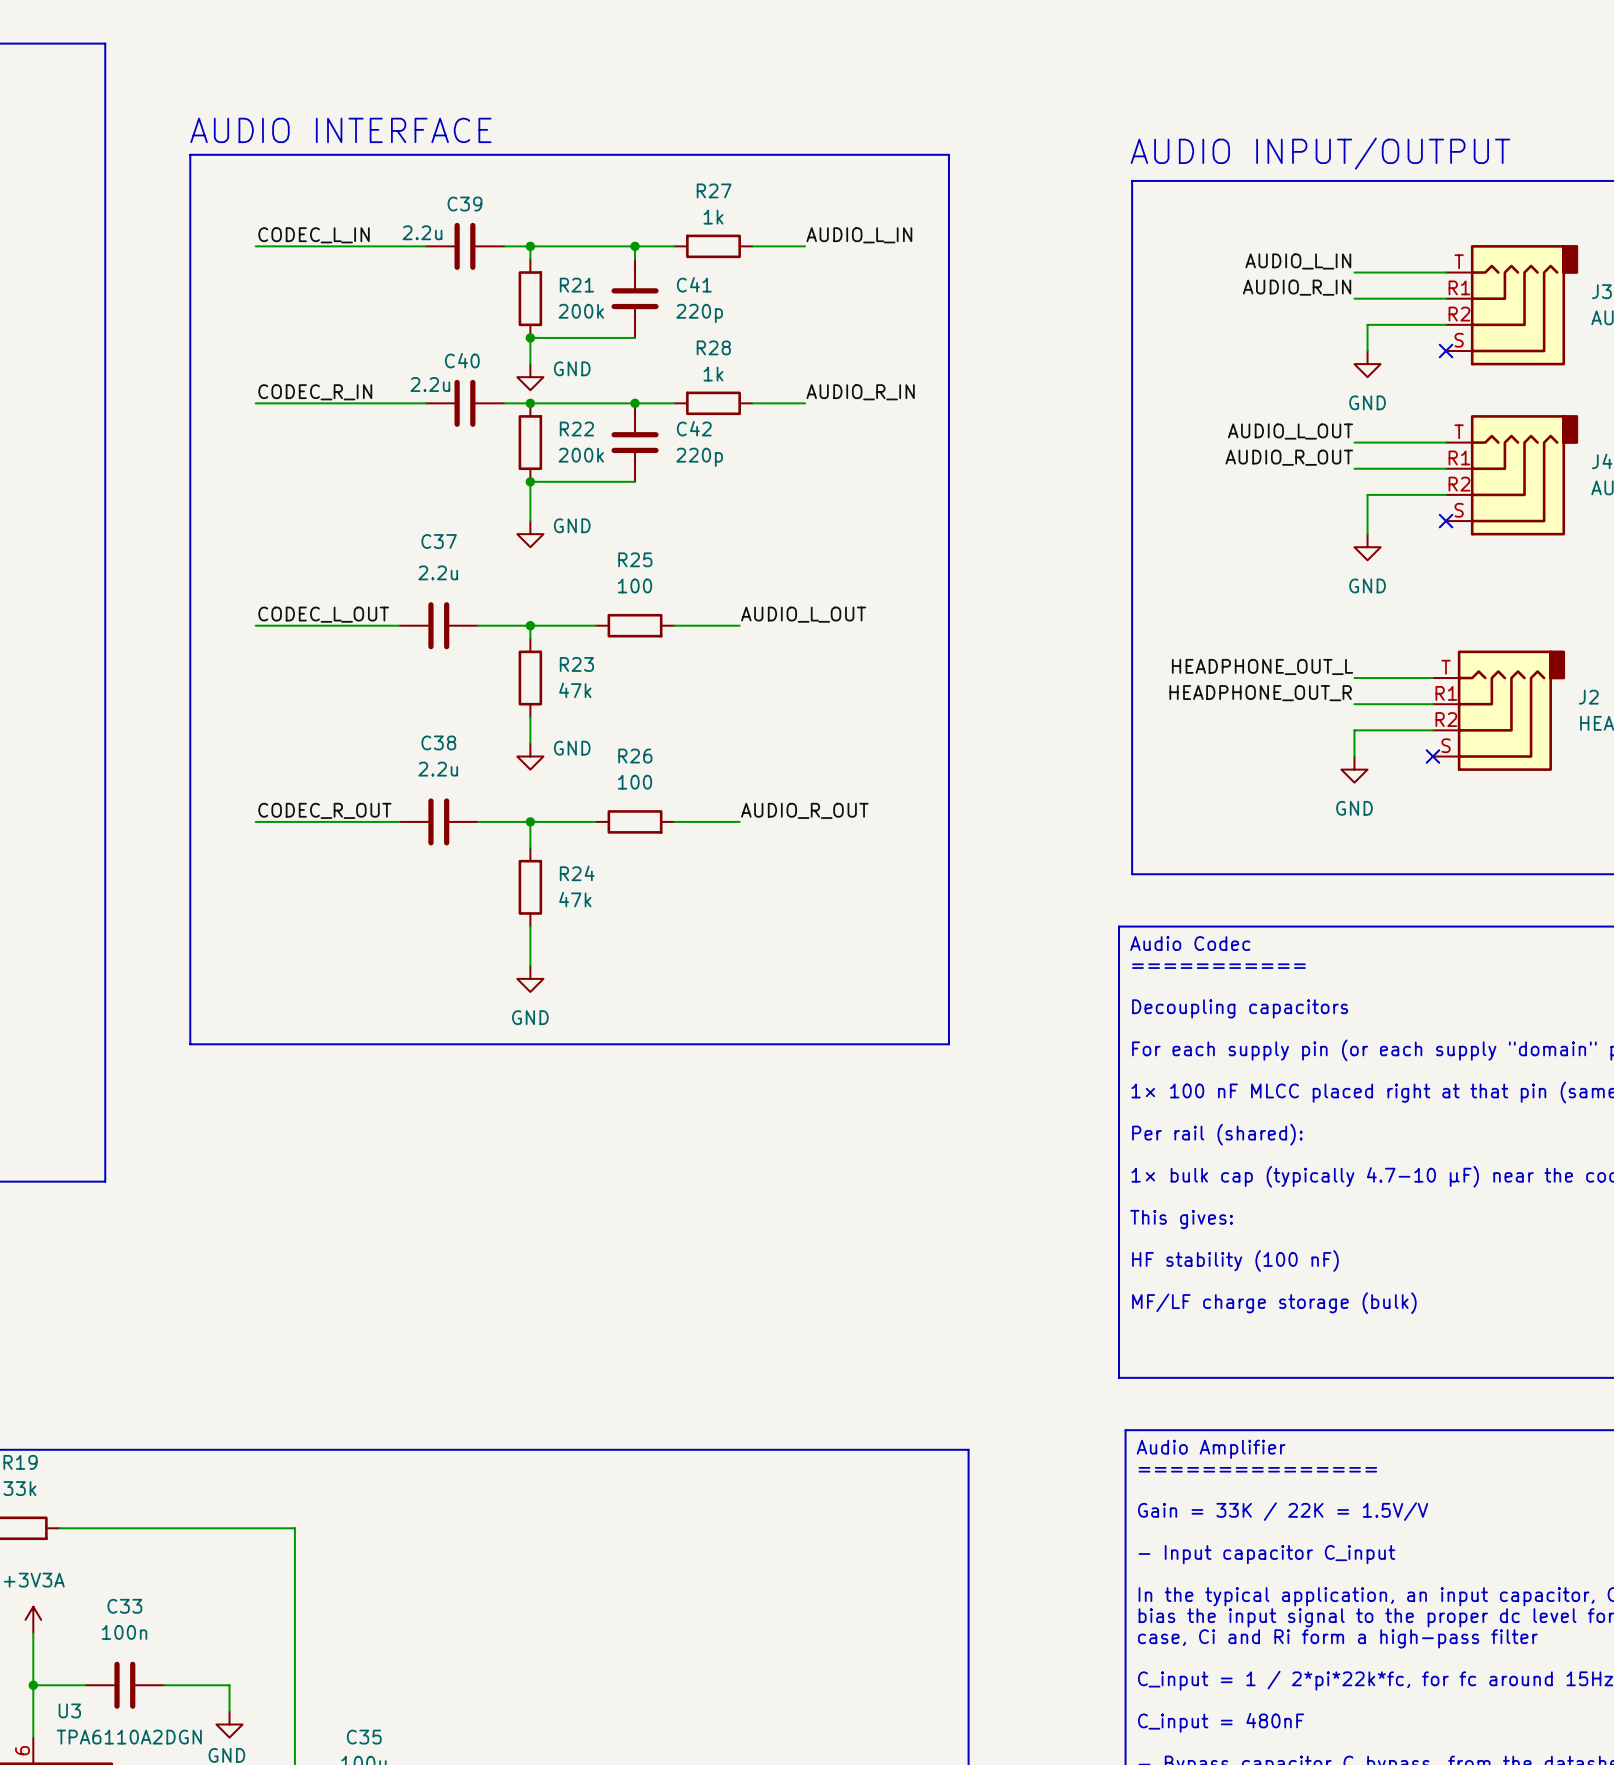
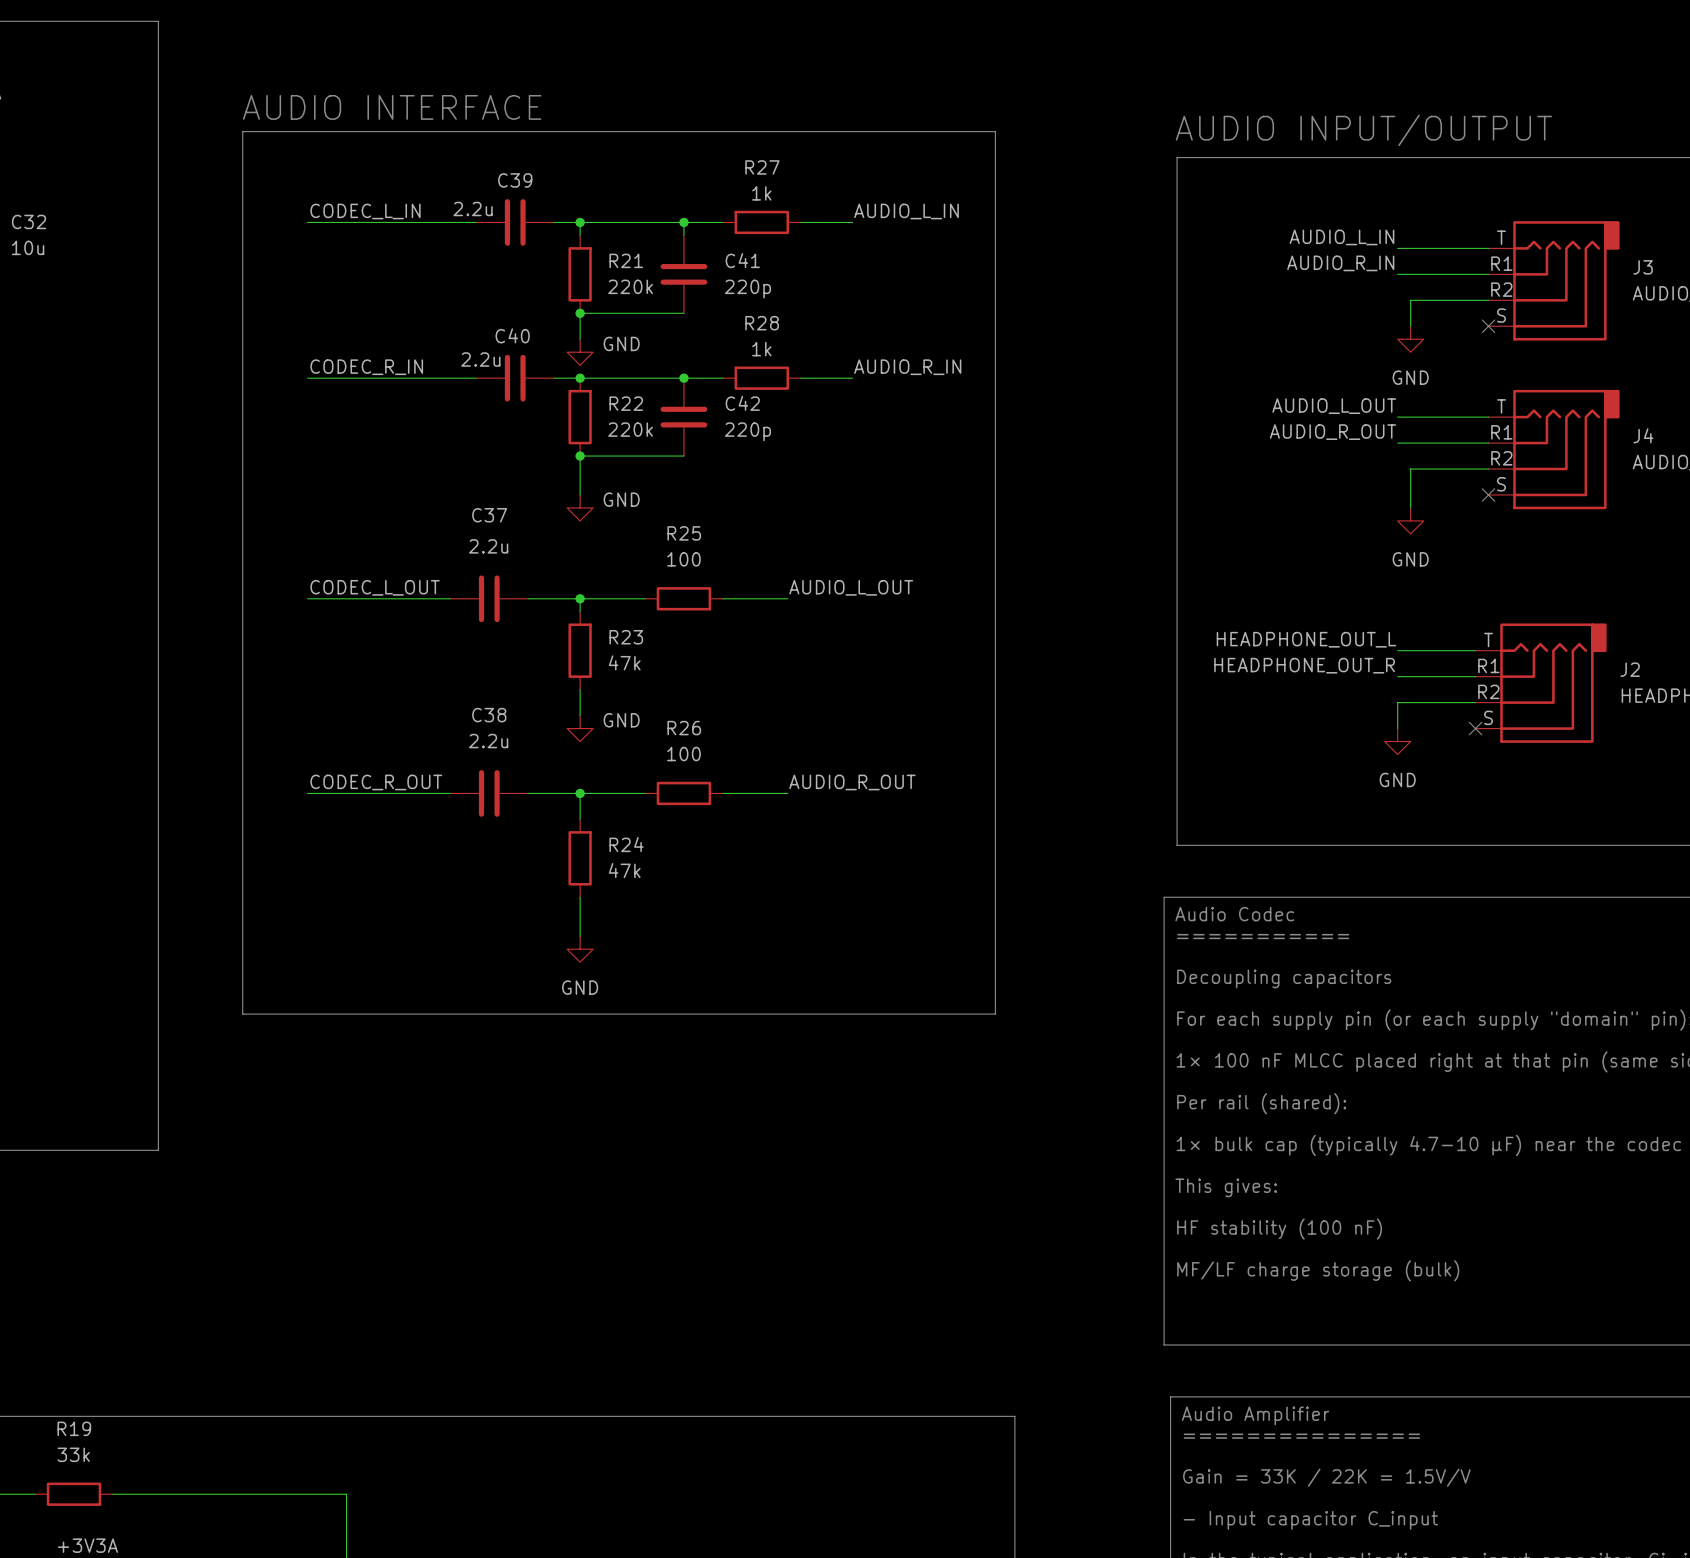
R21 value: 200k (581, 311) -> 220k (630, 286)
R22 value: 200k (581, 455) -> 220k (630, 429)

